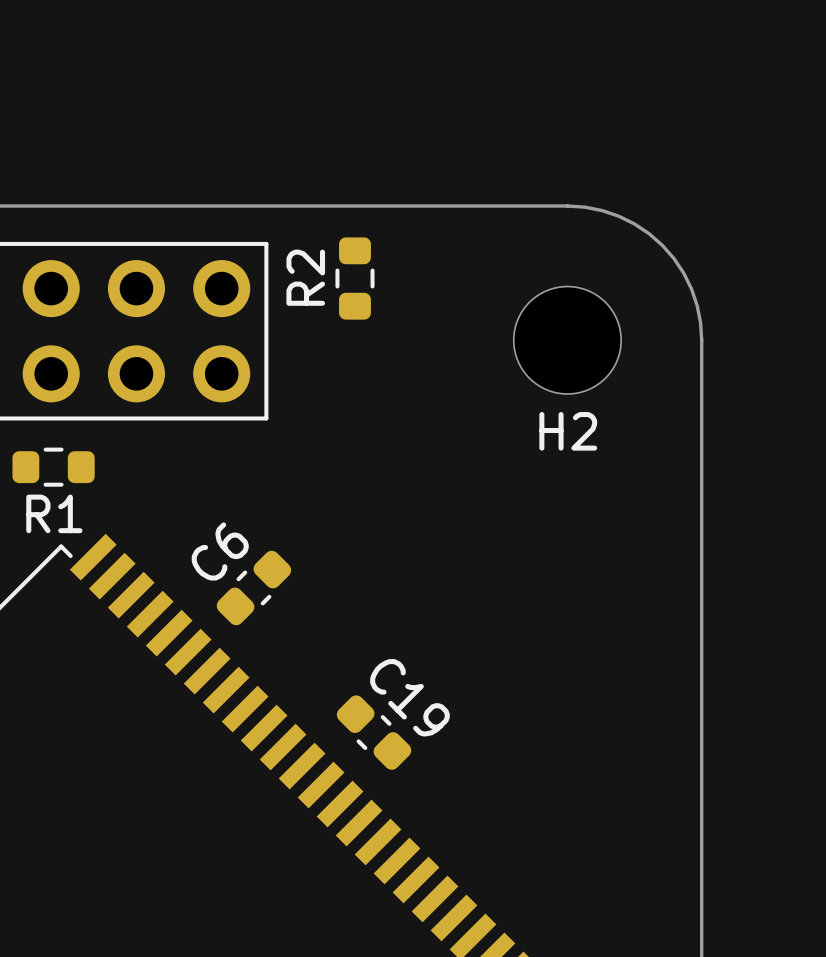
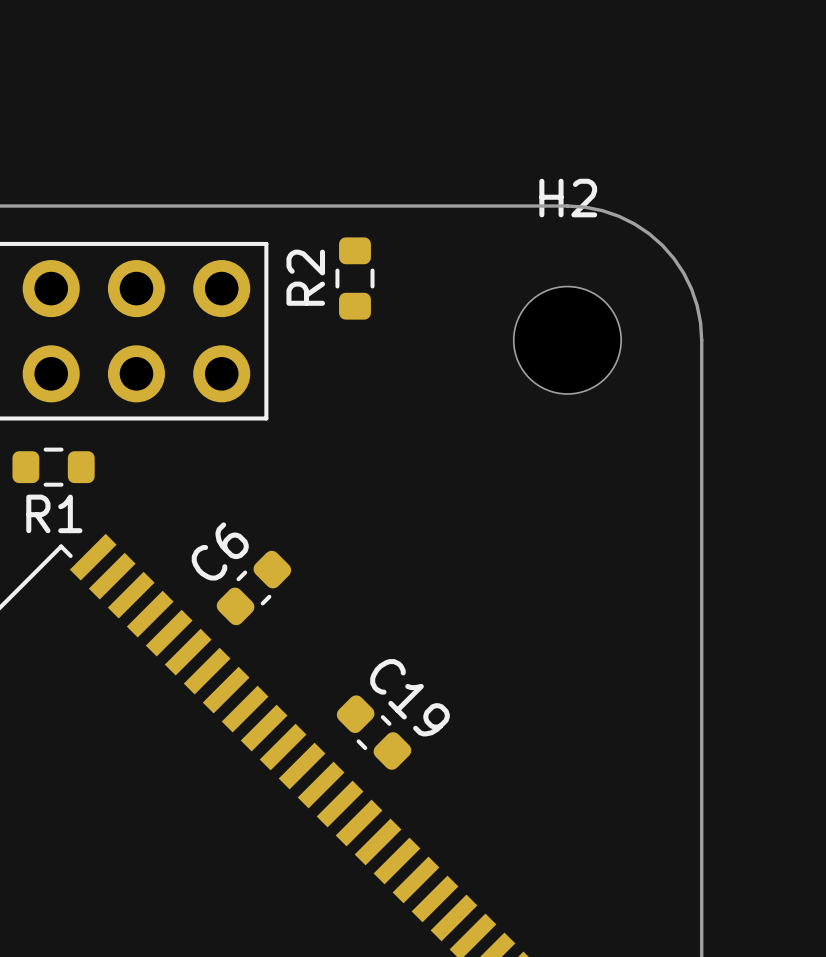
H2 name position: H2 (568, 431) -> H2 (568, 198)

